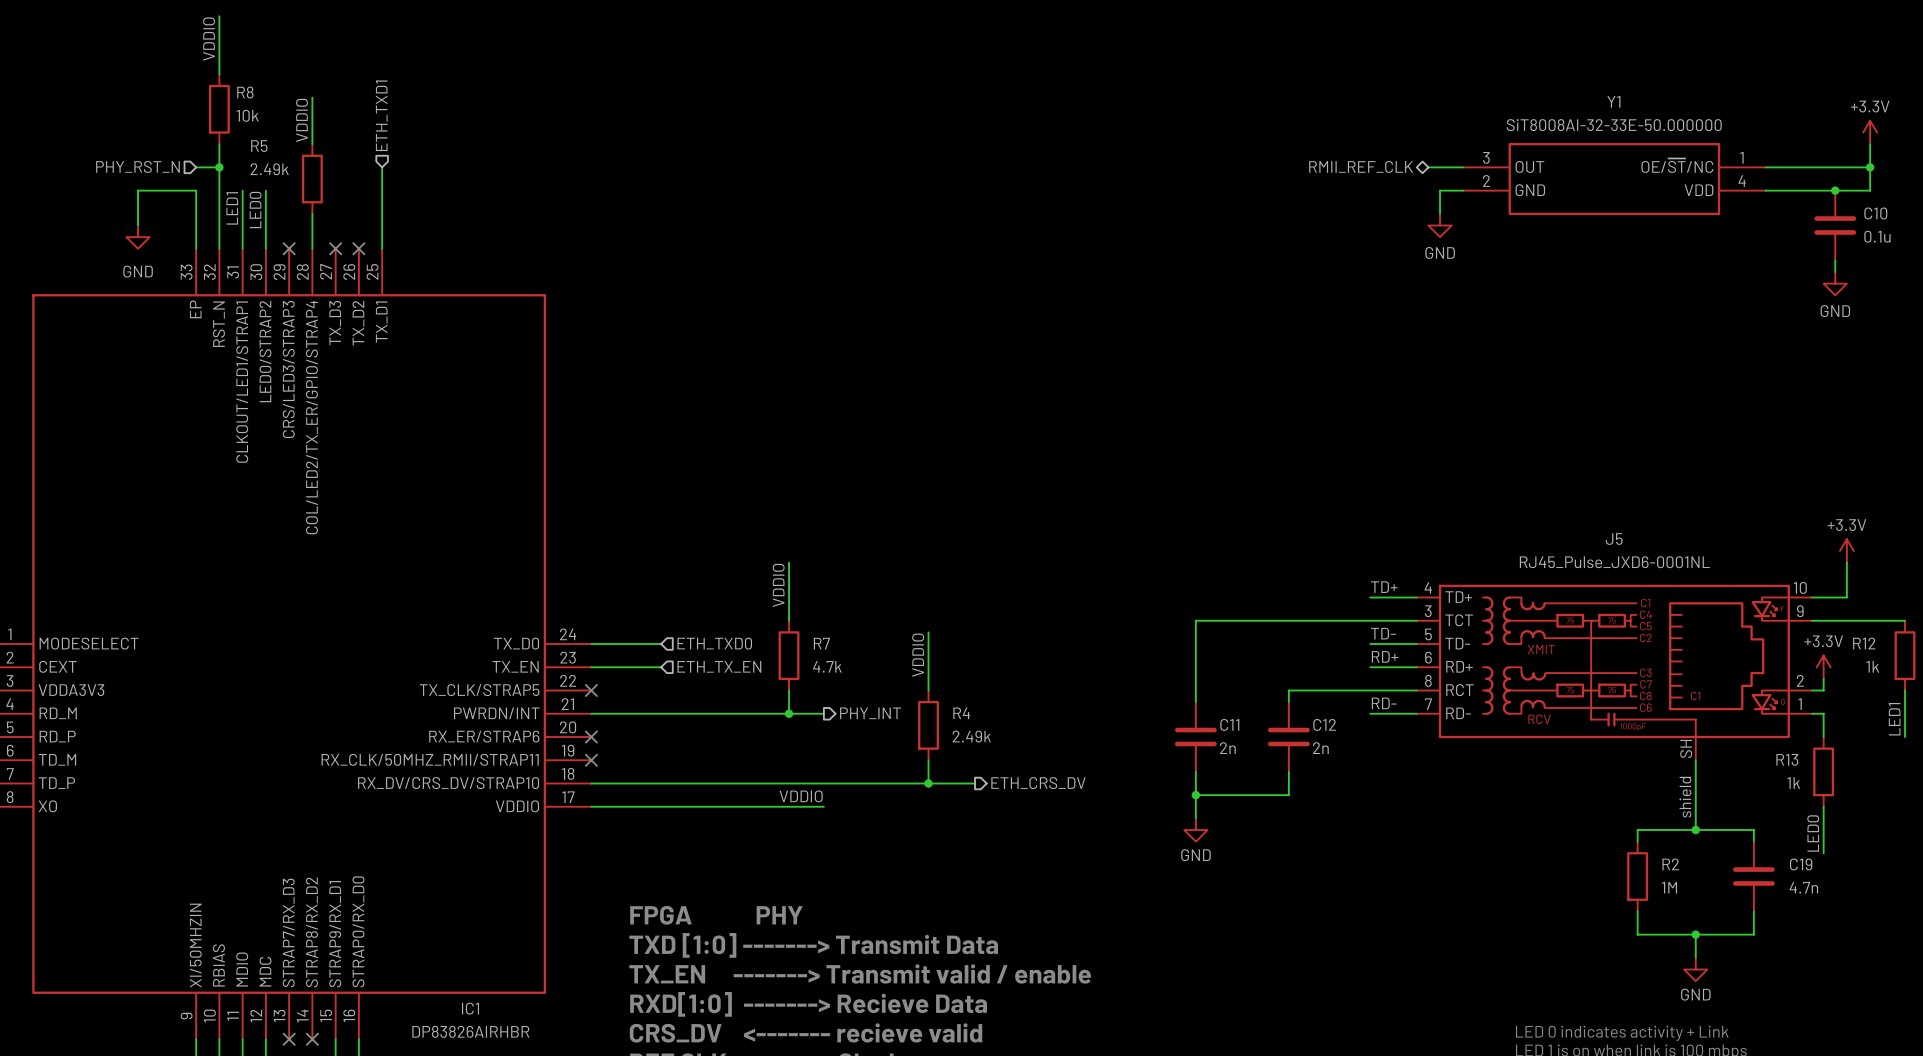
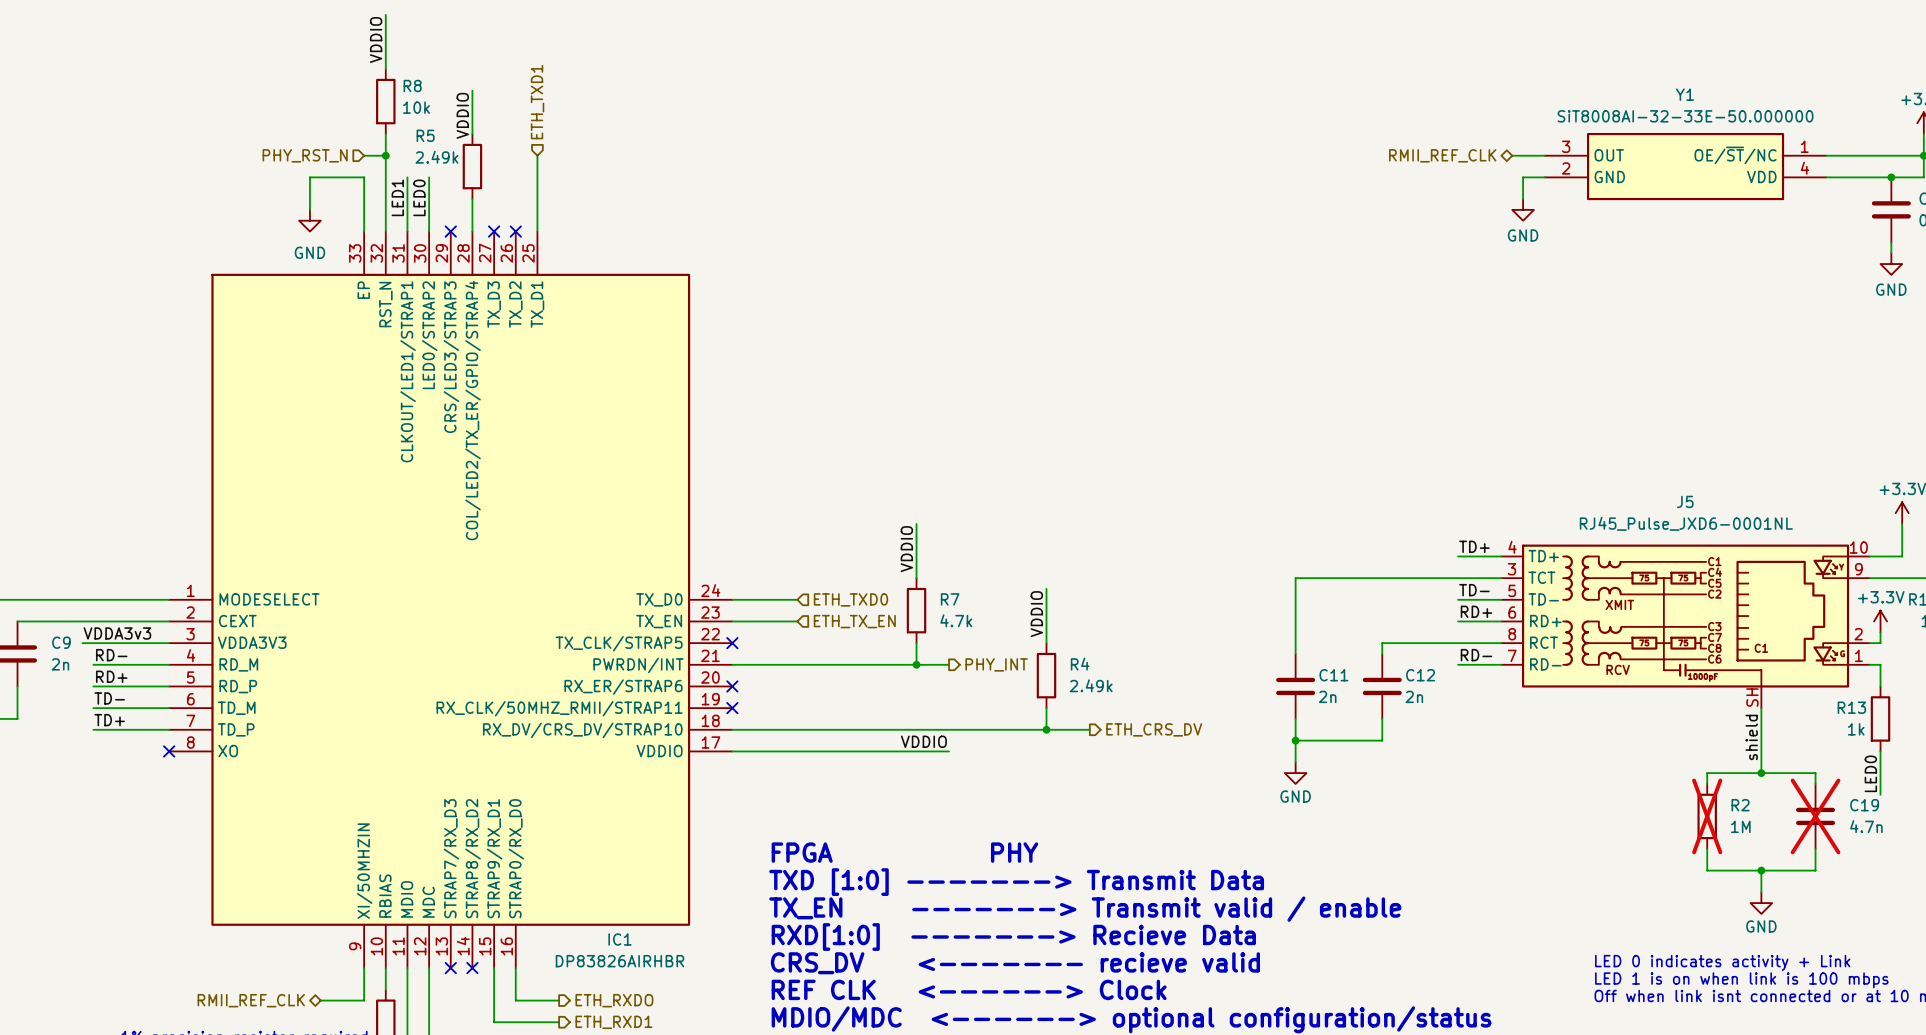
R2 do-not-place cross: none -> (1707, 816)
C19 do-not-place cross: none -> (1815, 816)

